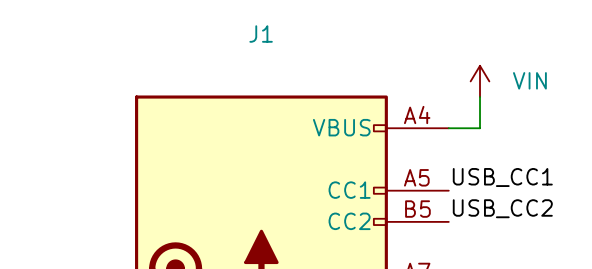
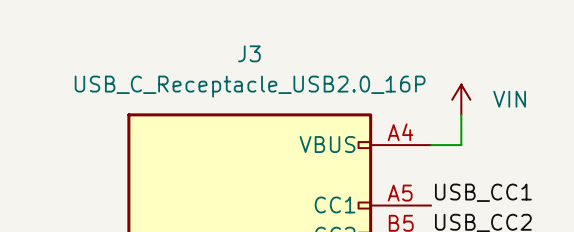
J1 name: J1 (261, 34) -> J3 (249, 53)
J1 value: none -> USB_C_Receptacle_USB2.0_16P (250, 86)

